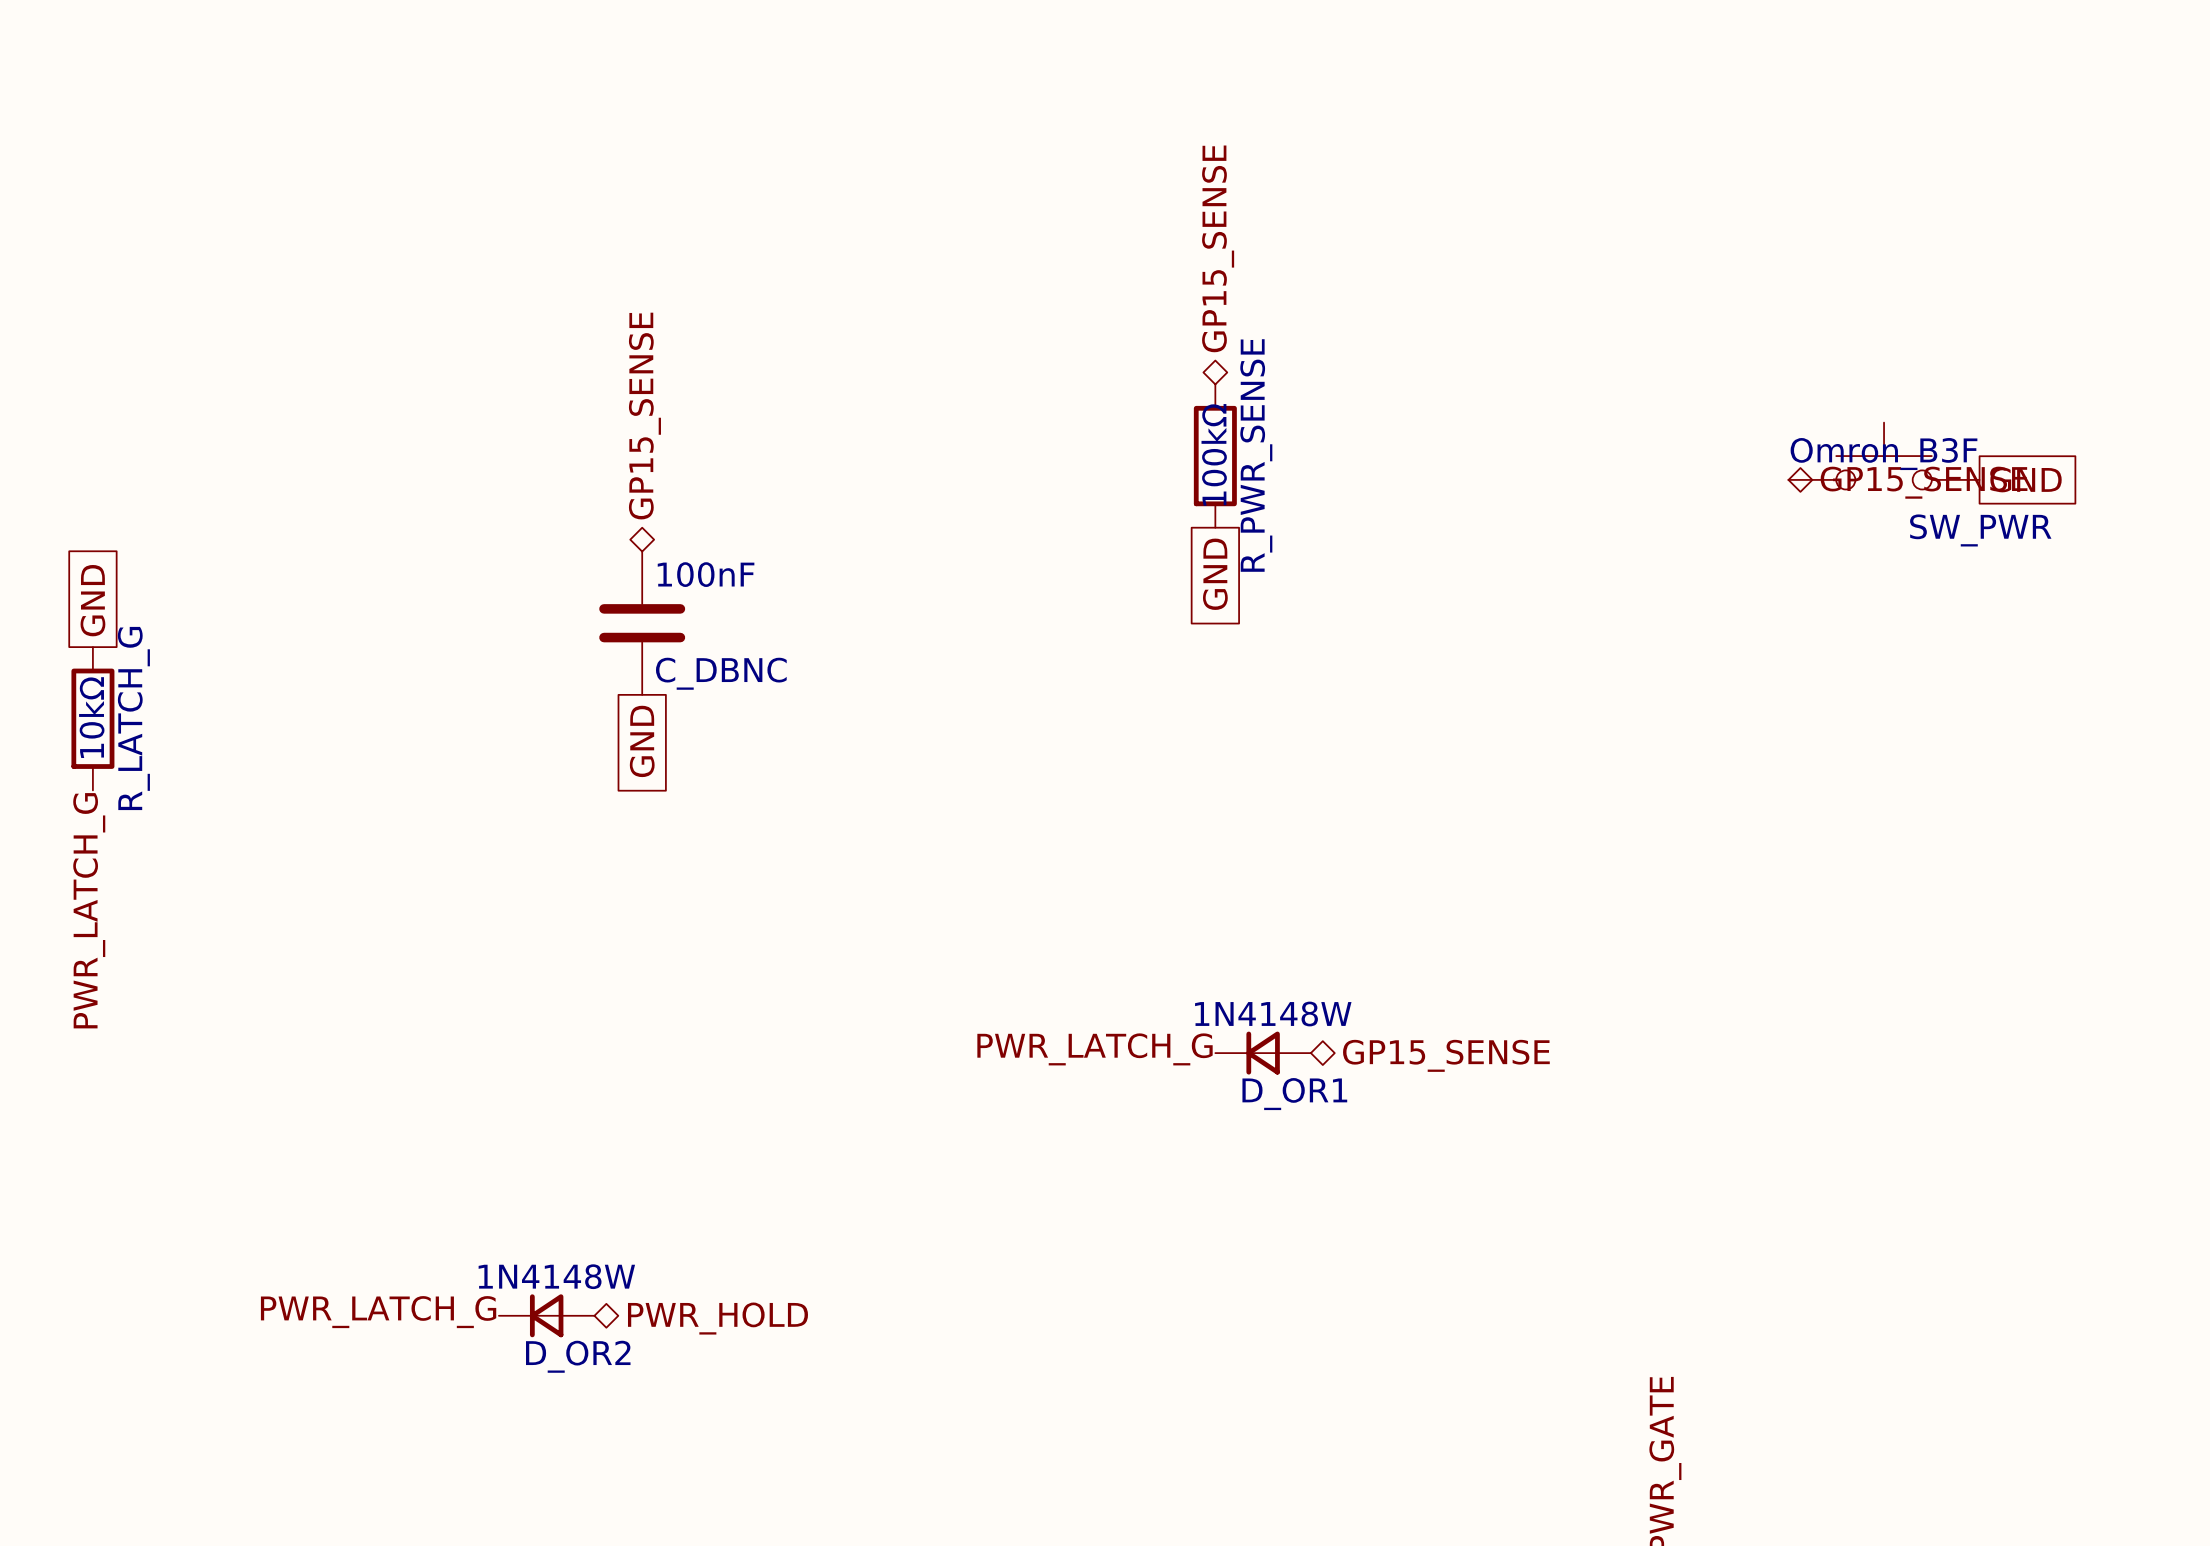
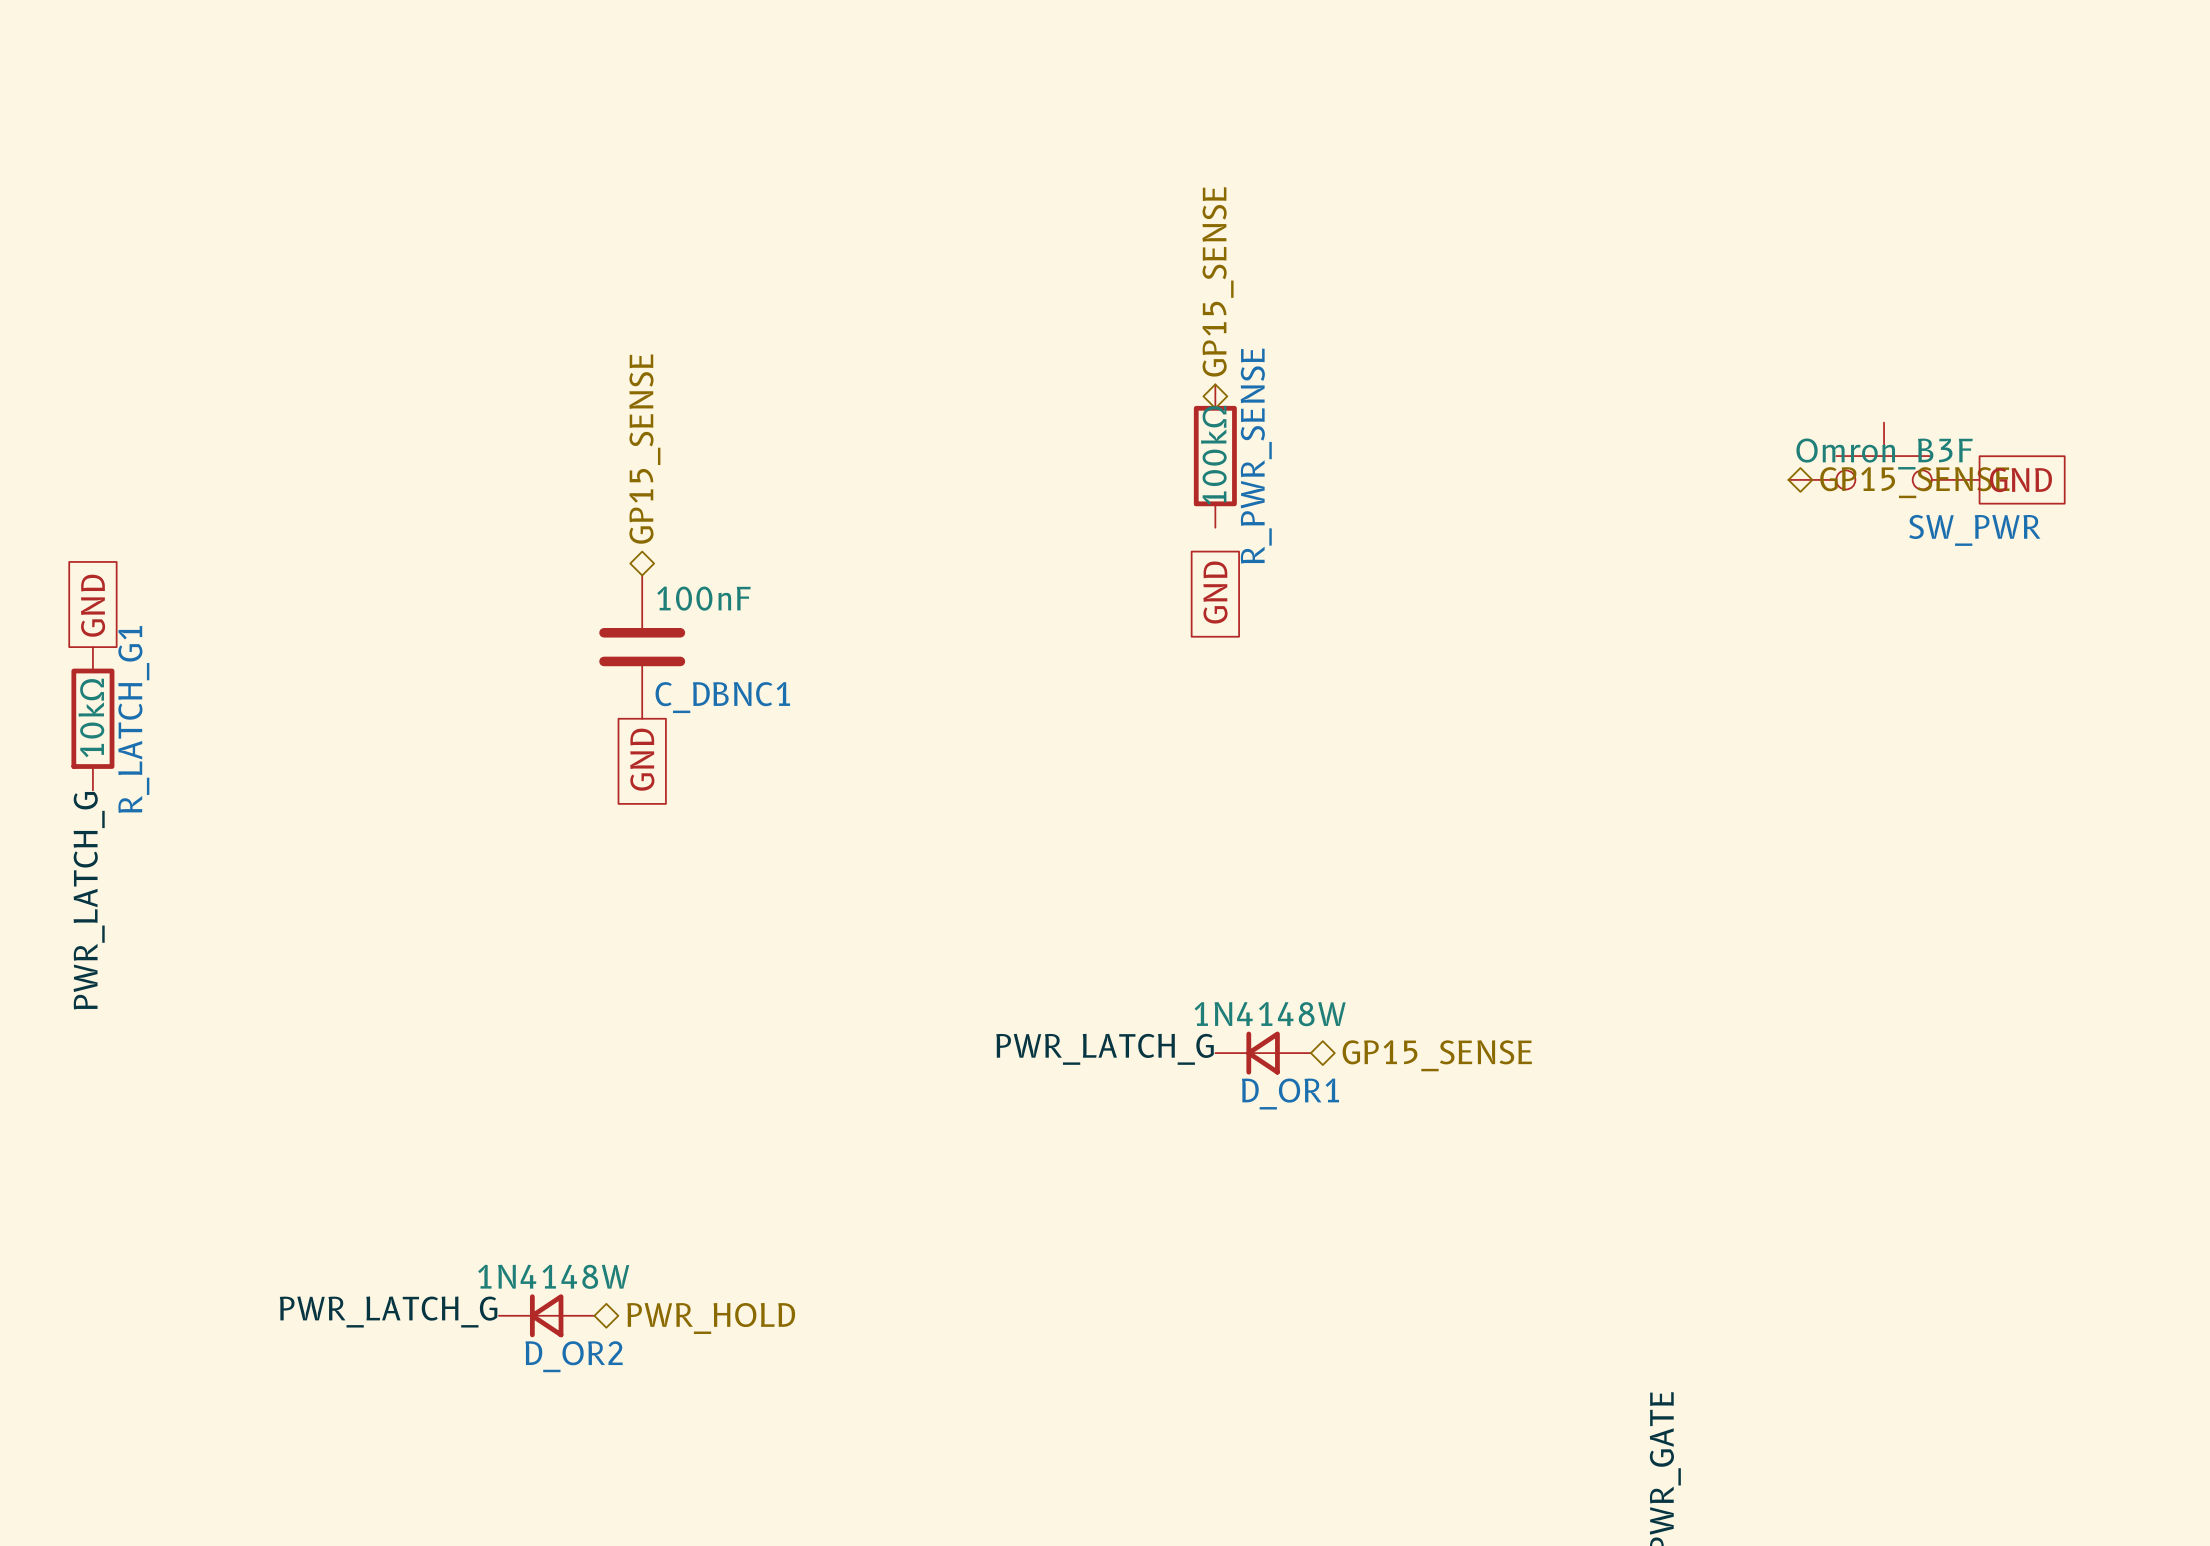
hierarchical label position: GP15_SENSE (1218, 248) -> GP15_SENSE (1218, 281)
hierarchical label position: GP15_SENSE (644, 416) -> GP15_SENSE (644, 449)
global label position: GND (1215, 574) -> GND (1215, 592)
C_DBNC: 100nF (642, 623) -> none
C_DBNC1: none -> 100nF (642, 647)
R_LATCH_G name: R_LATCH_G (133, 718) -> R_LATCH_G1 (133, 719)
global label position: GND (642, 741) -> GND (642, 759)

